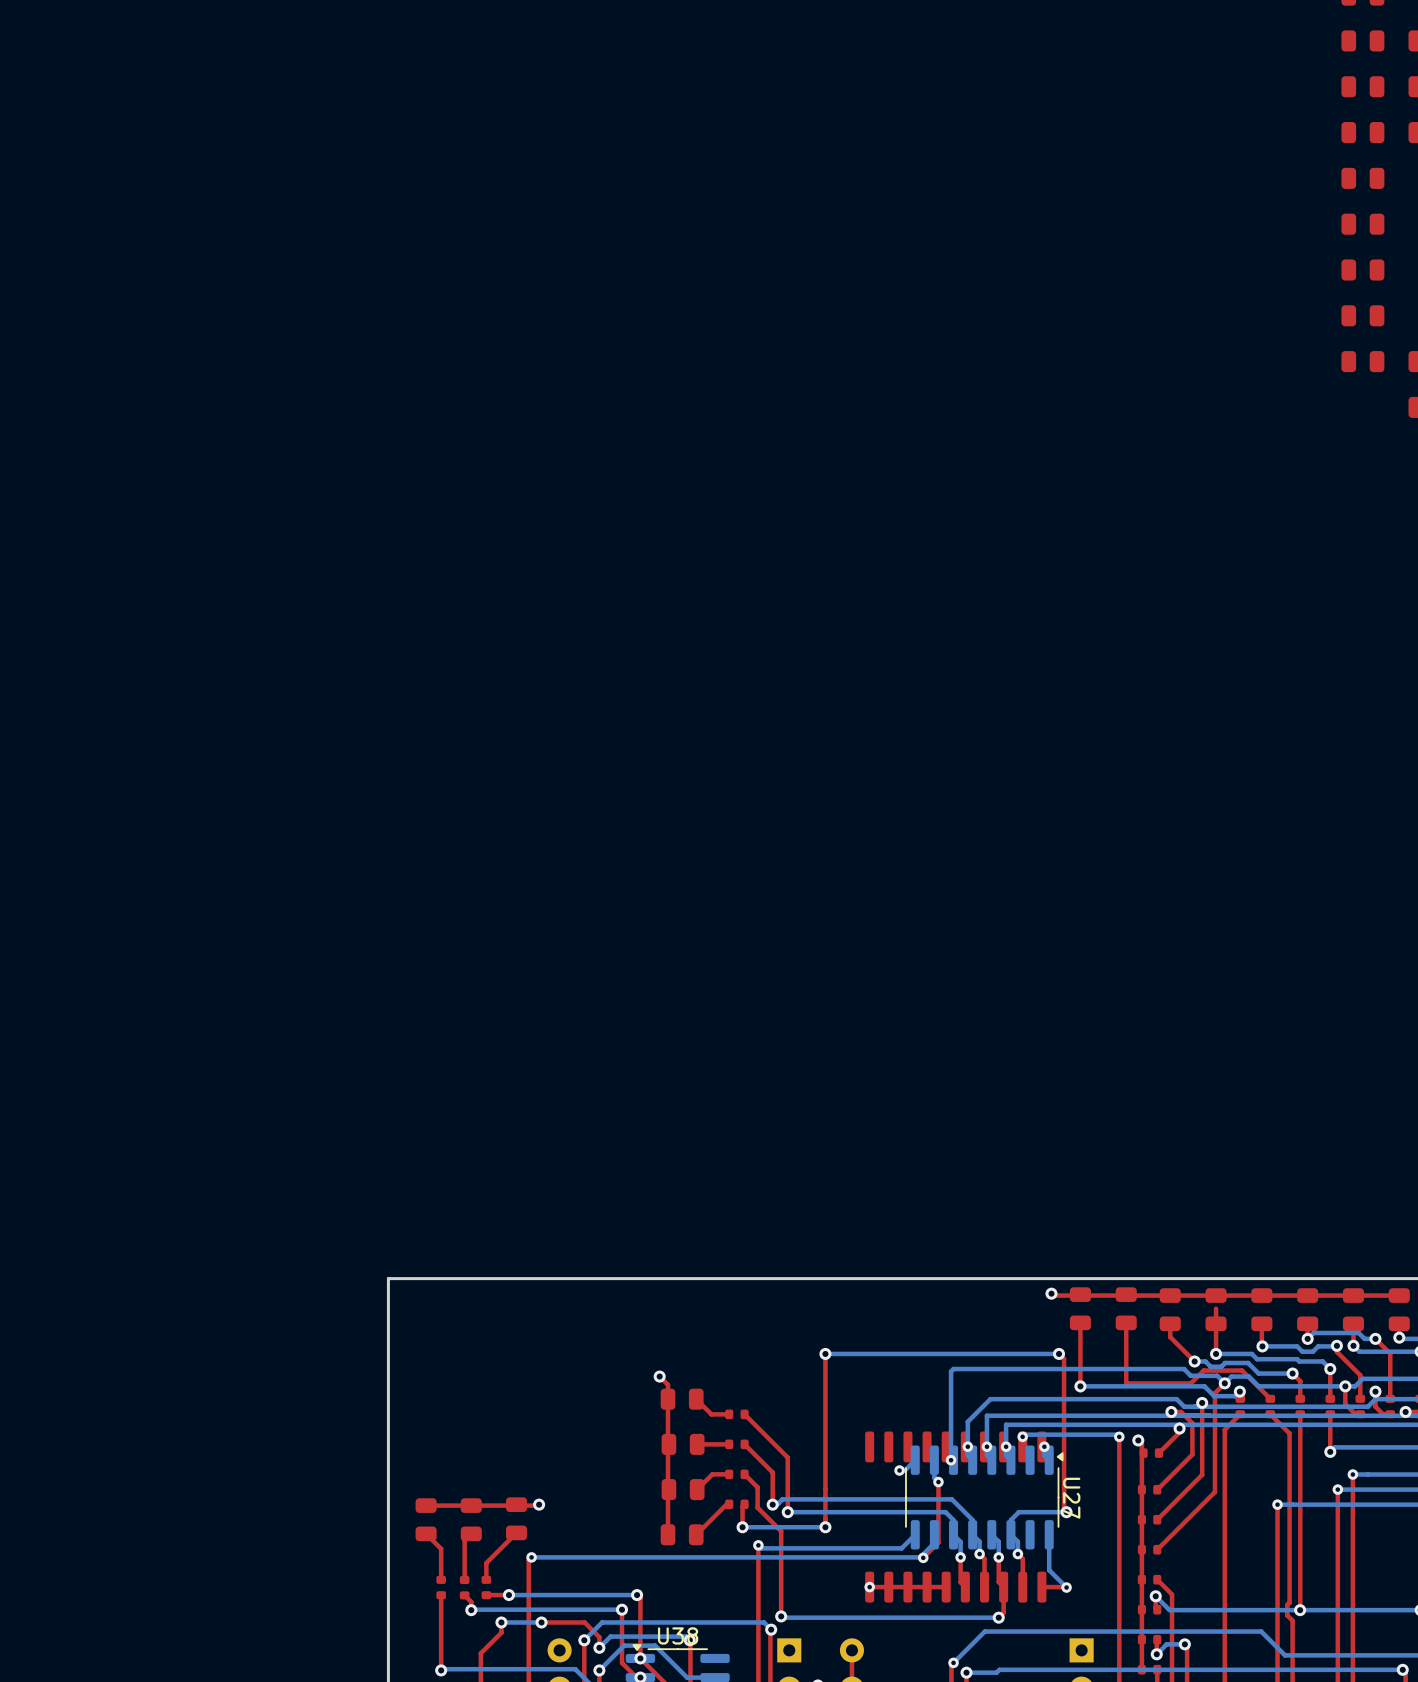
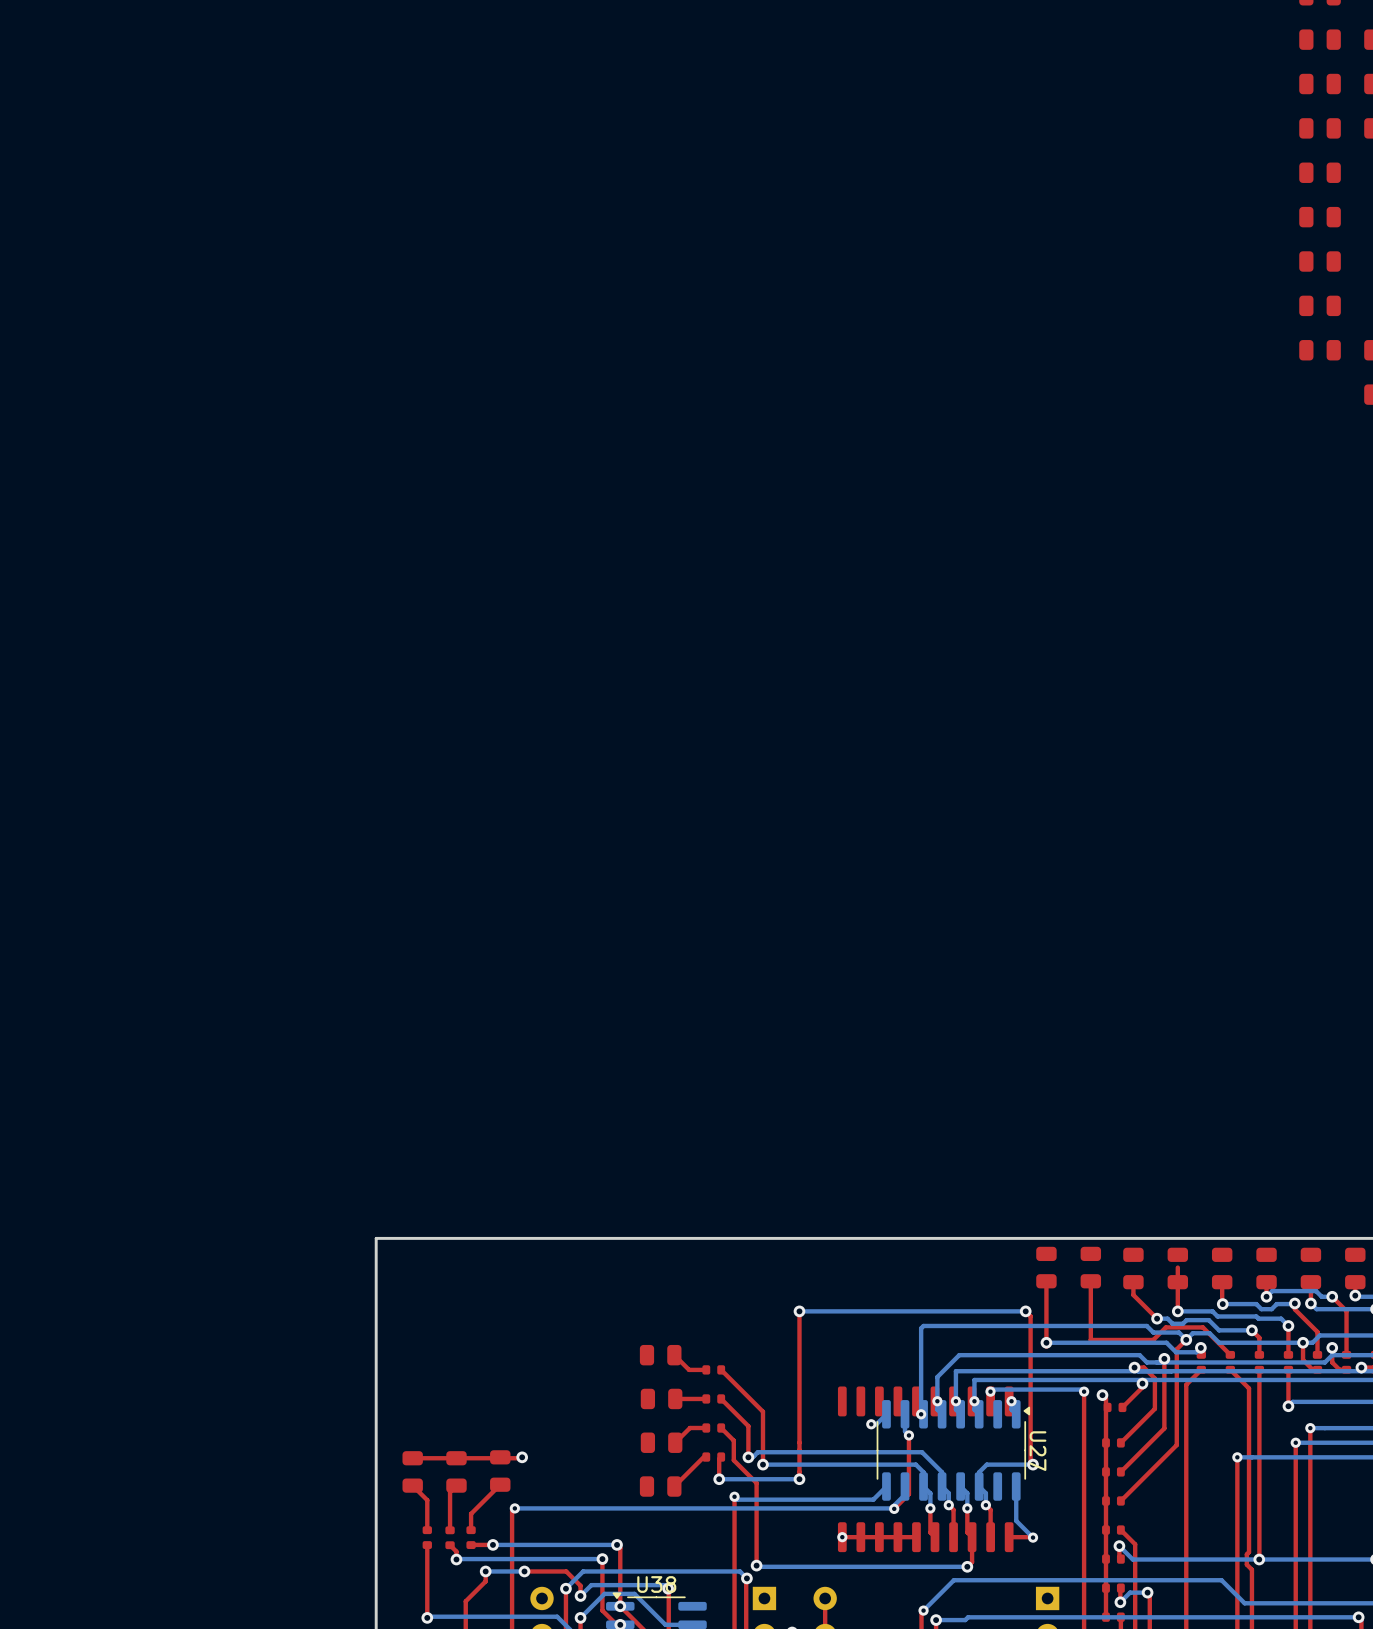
top track: (1051, 1293) (1053, 1295) (1399, 1295) -> none
via: (1051, 1293) -> none
top track: (659, 1376) (668, 1384) (668, 1534) -> none
via: (659, 1376) -> none

